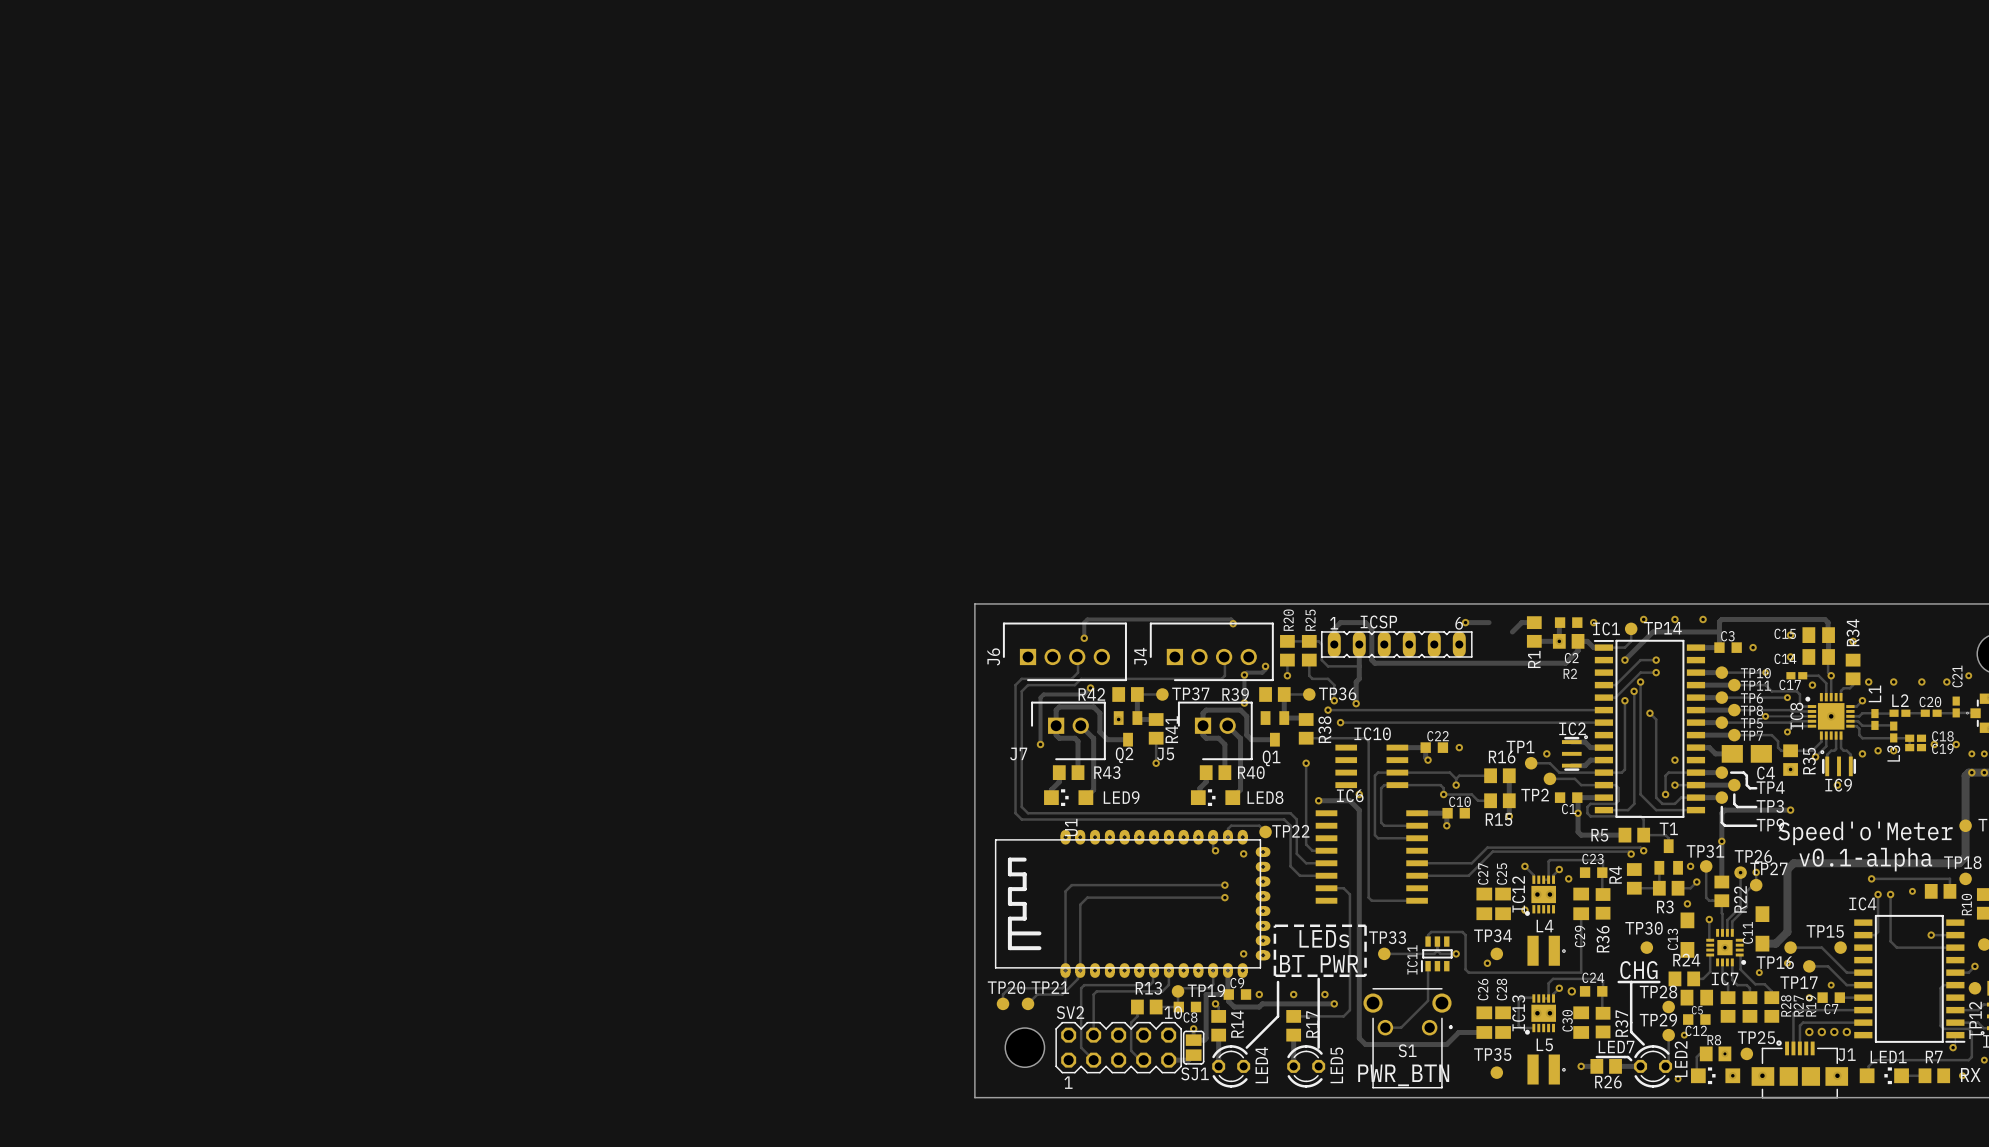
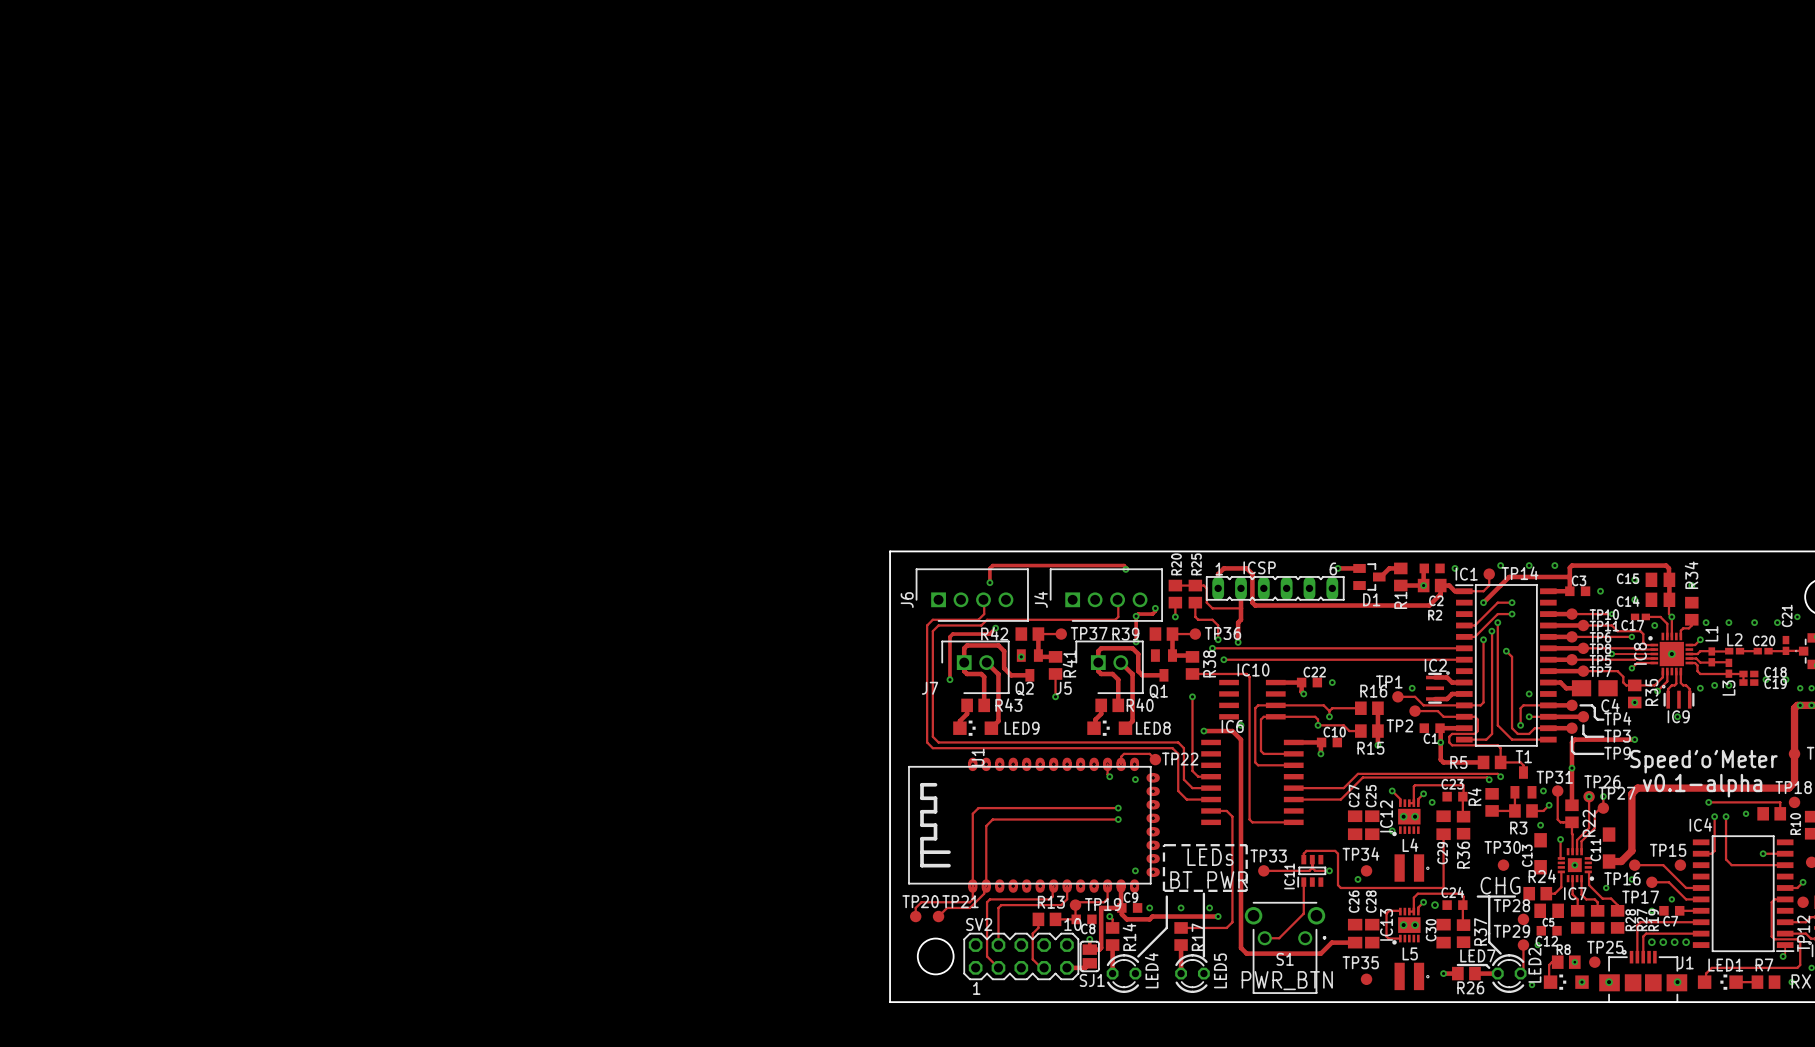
D1: none -> (1369, 576)

